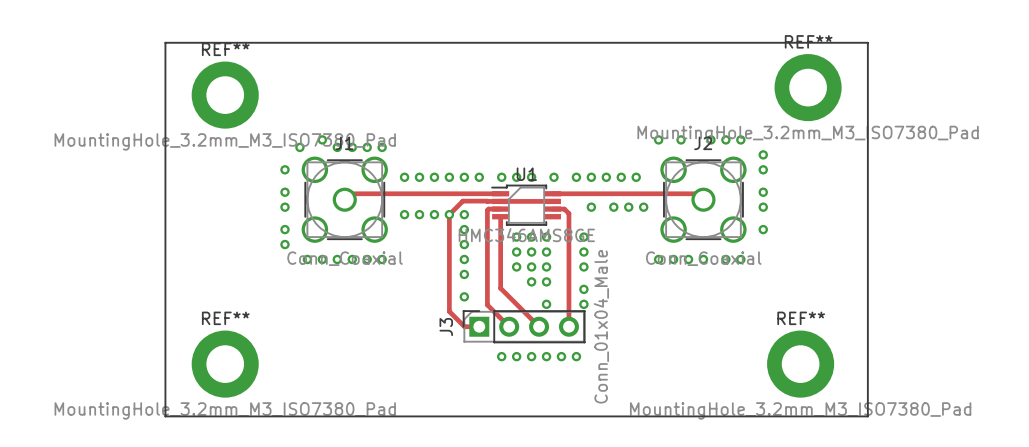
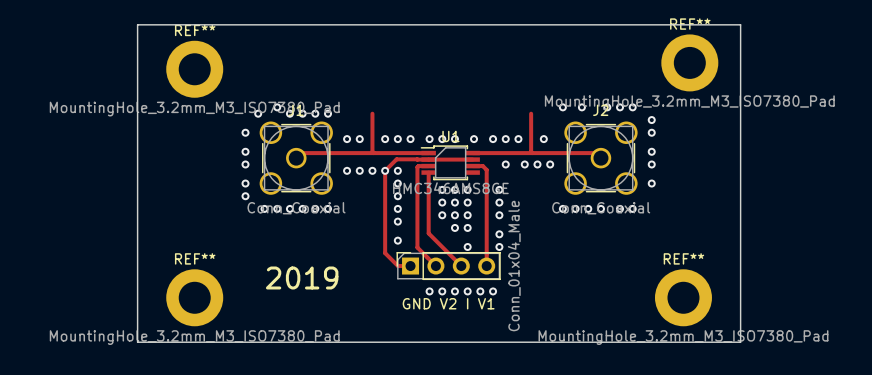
board edge: none -> (137, 24) (740, 24) (740, 342) (137, 342) (137, 24)
line: (165, 42) (867, 42) (867, 416) (165, 416) (165, 42) -> none
top track: none -> (372, 113) (373, 153)
top track: none -> (531, 113) (532, 153)
via: (434, 177) -> none
via: (621, 177) -> none
J3 name: J3 (446, 327) -> GND V2 I V1 (448, 303)
text: none -> 2019 (302, 277)

